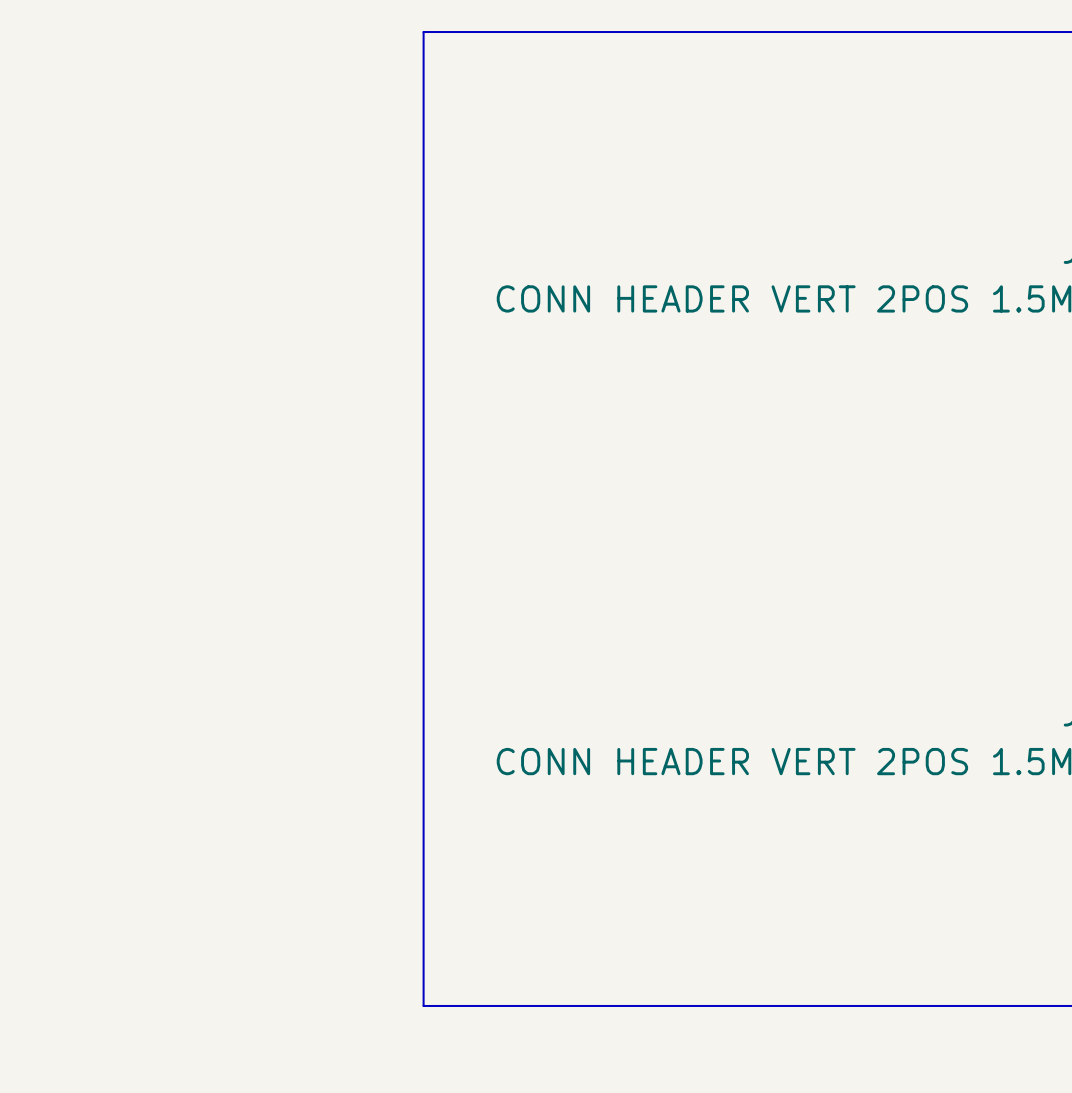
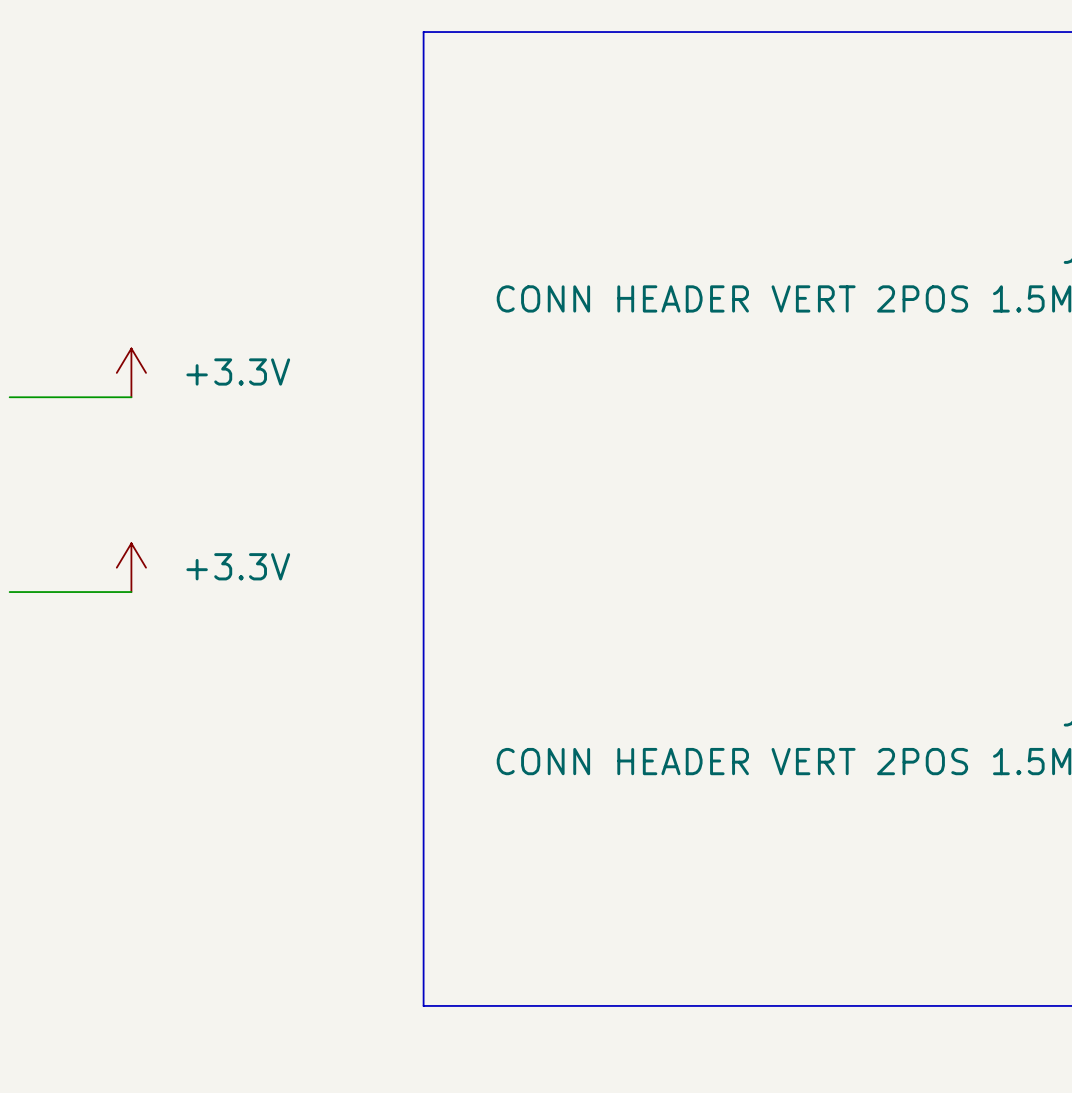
power symbol: none -> +3.3V (131, 372)
wire: none -> (9, 397) (131, 397)
power symbol: none -> +3.3V (131, 567)
wire: none -> (9, 592) (131, 592)

